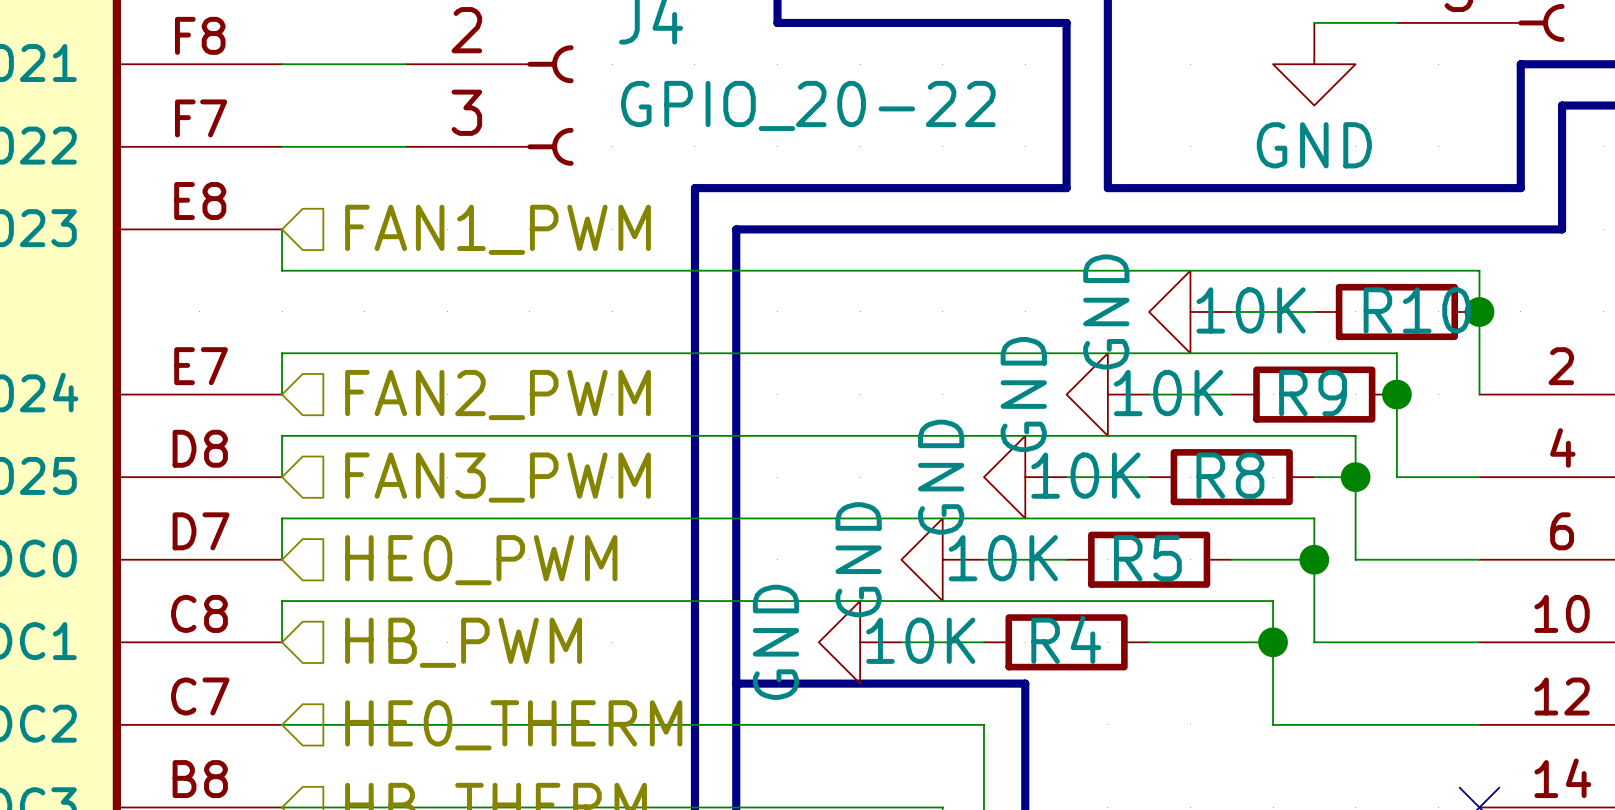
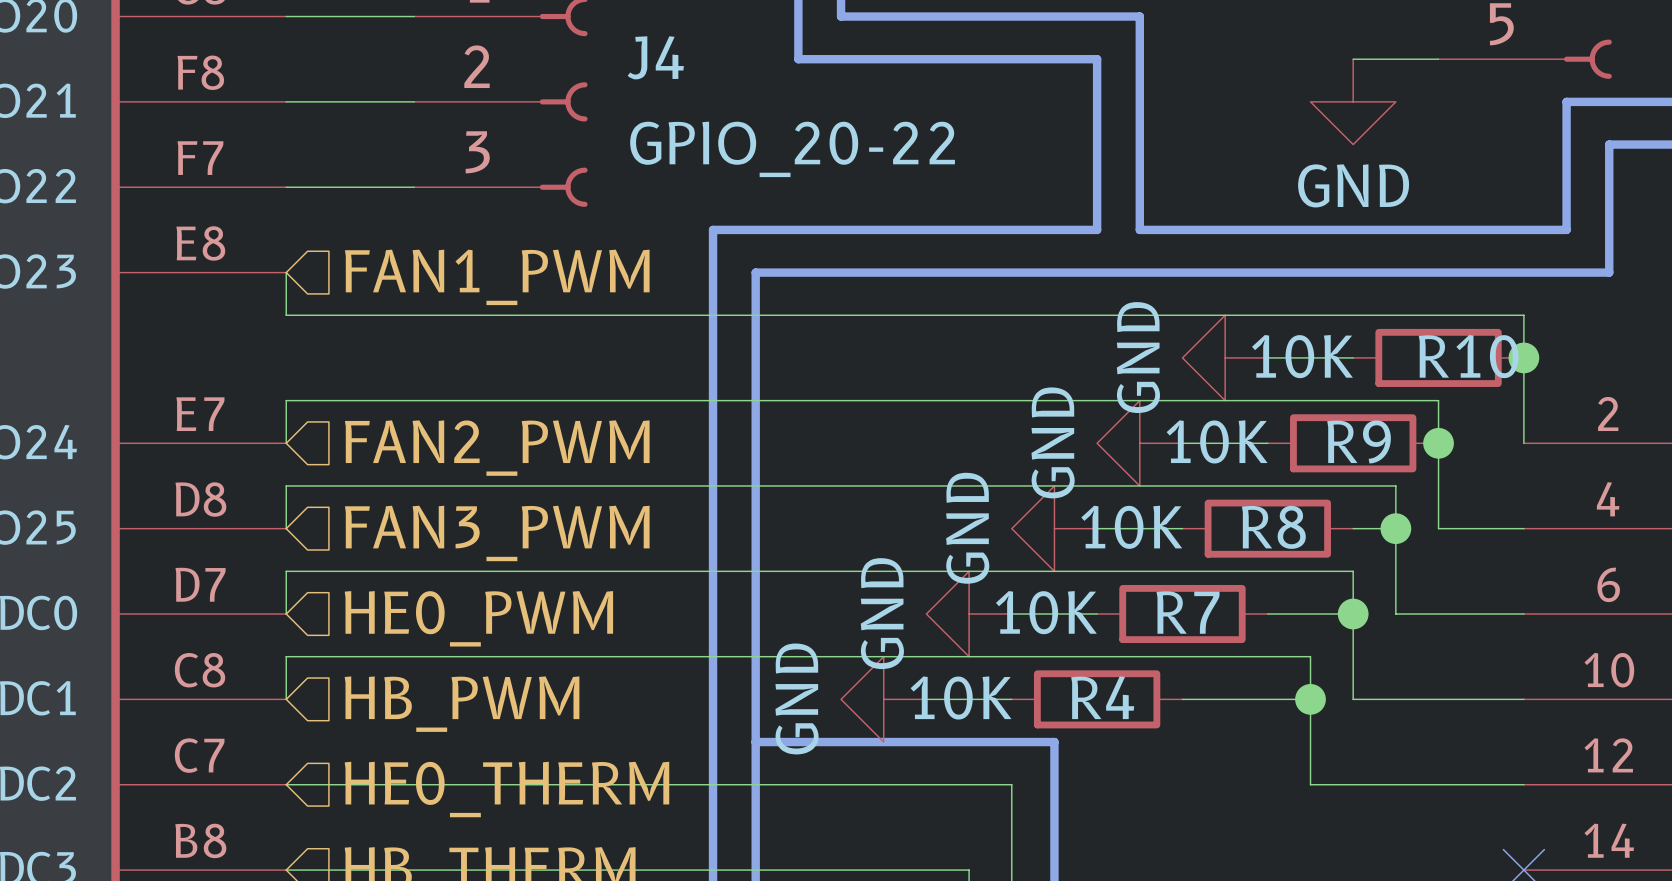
R5 name: R5 (1147, 558) -> R7 (1188, 612)

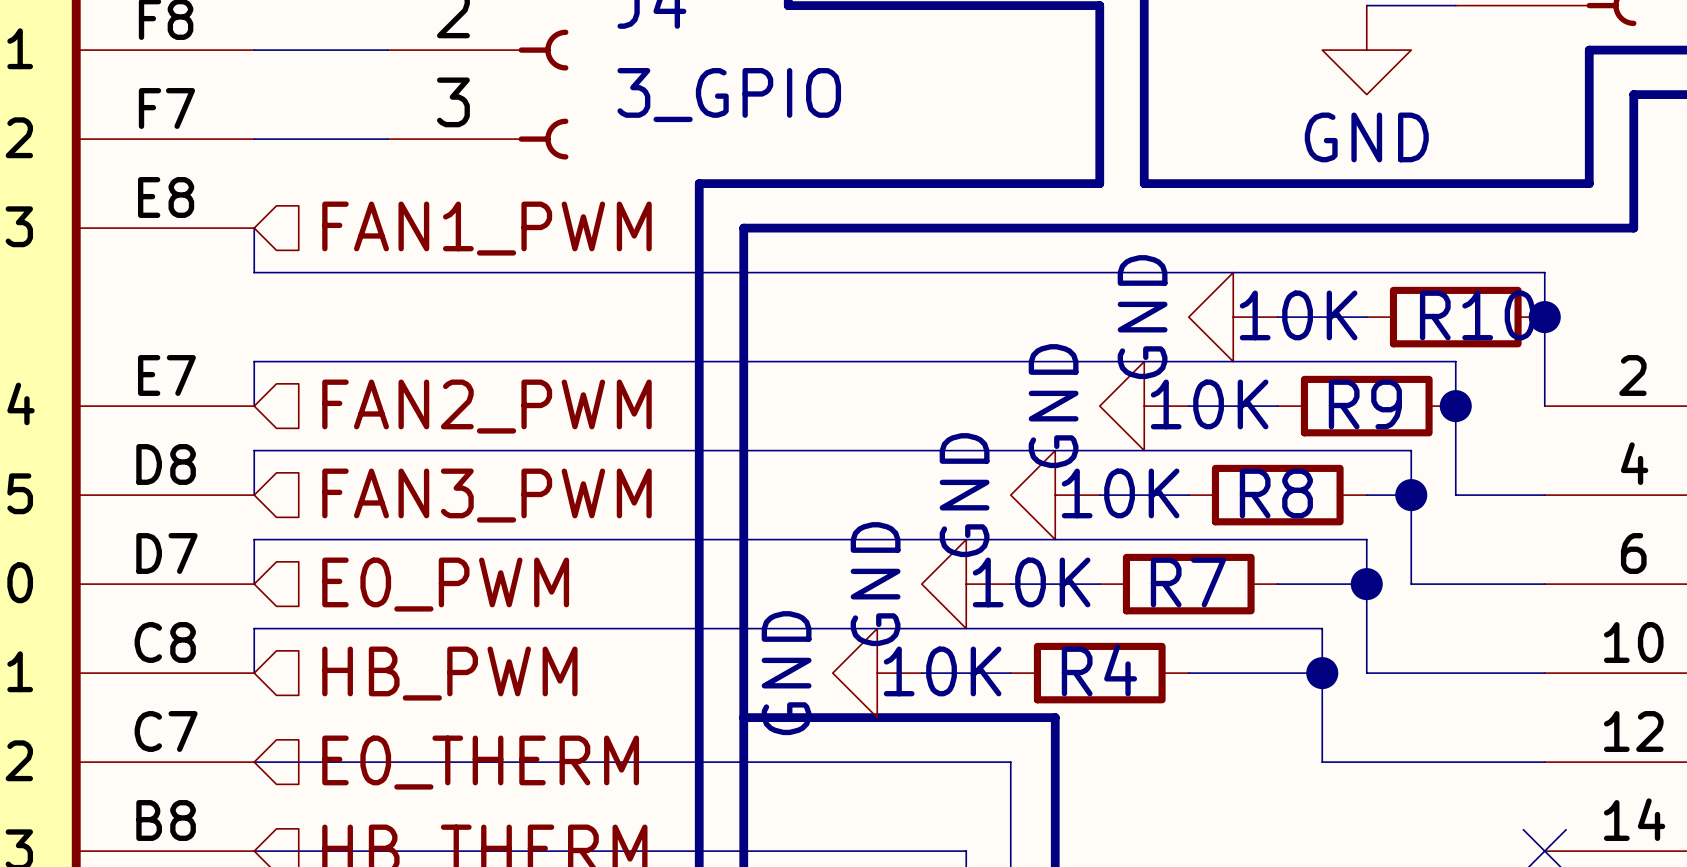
J4 value: GPIO_20-22 (792, 149) -> 3_GPIO (729, 95)
hierarchical label: HE0_PWM (478, 618) -> E0_PWM (445, 584)
hierarchical label: HE0_THERM (506, 789) -> E0_THERM (480, 762)

